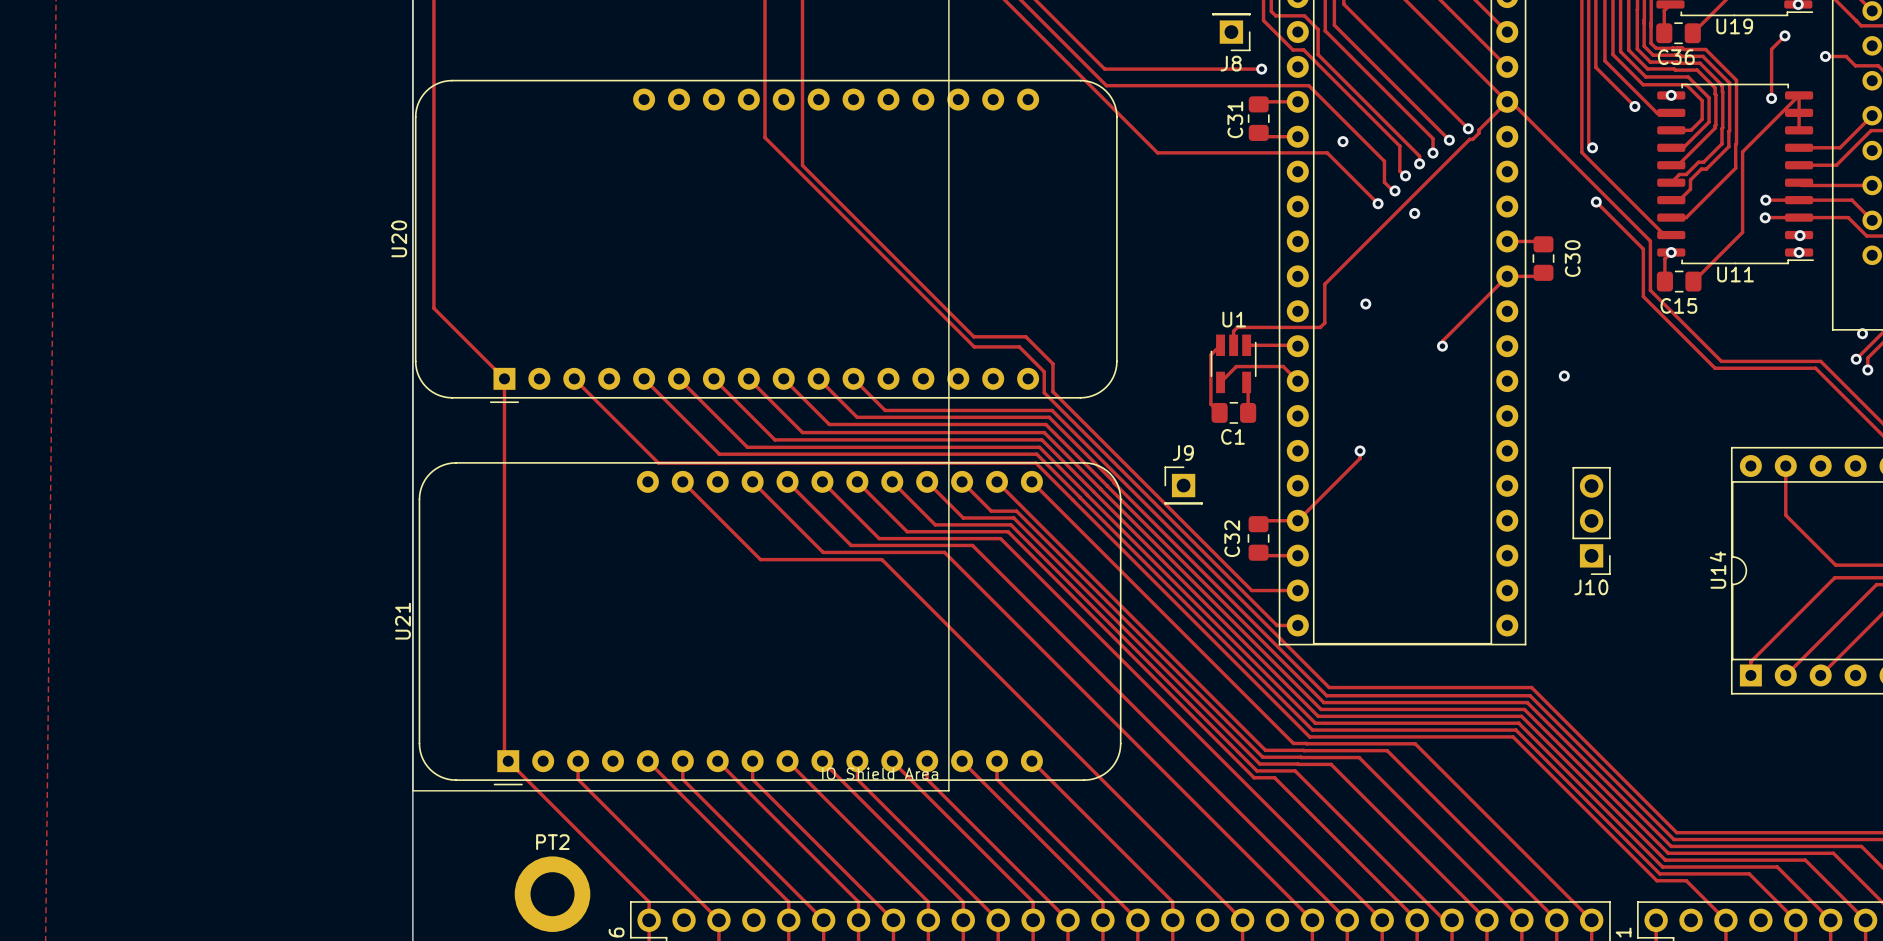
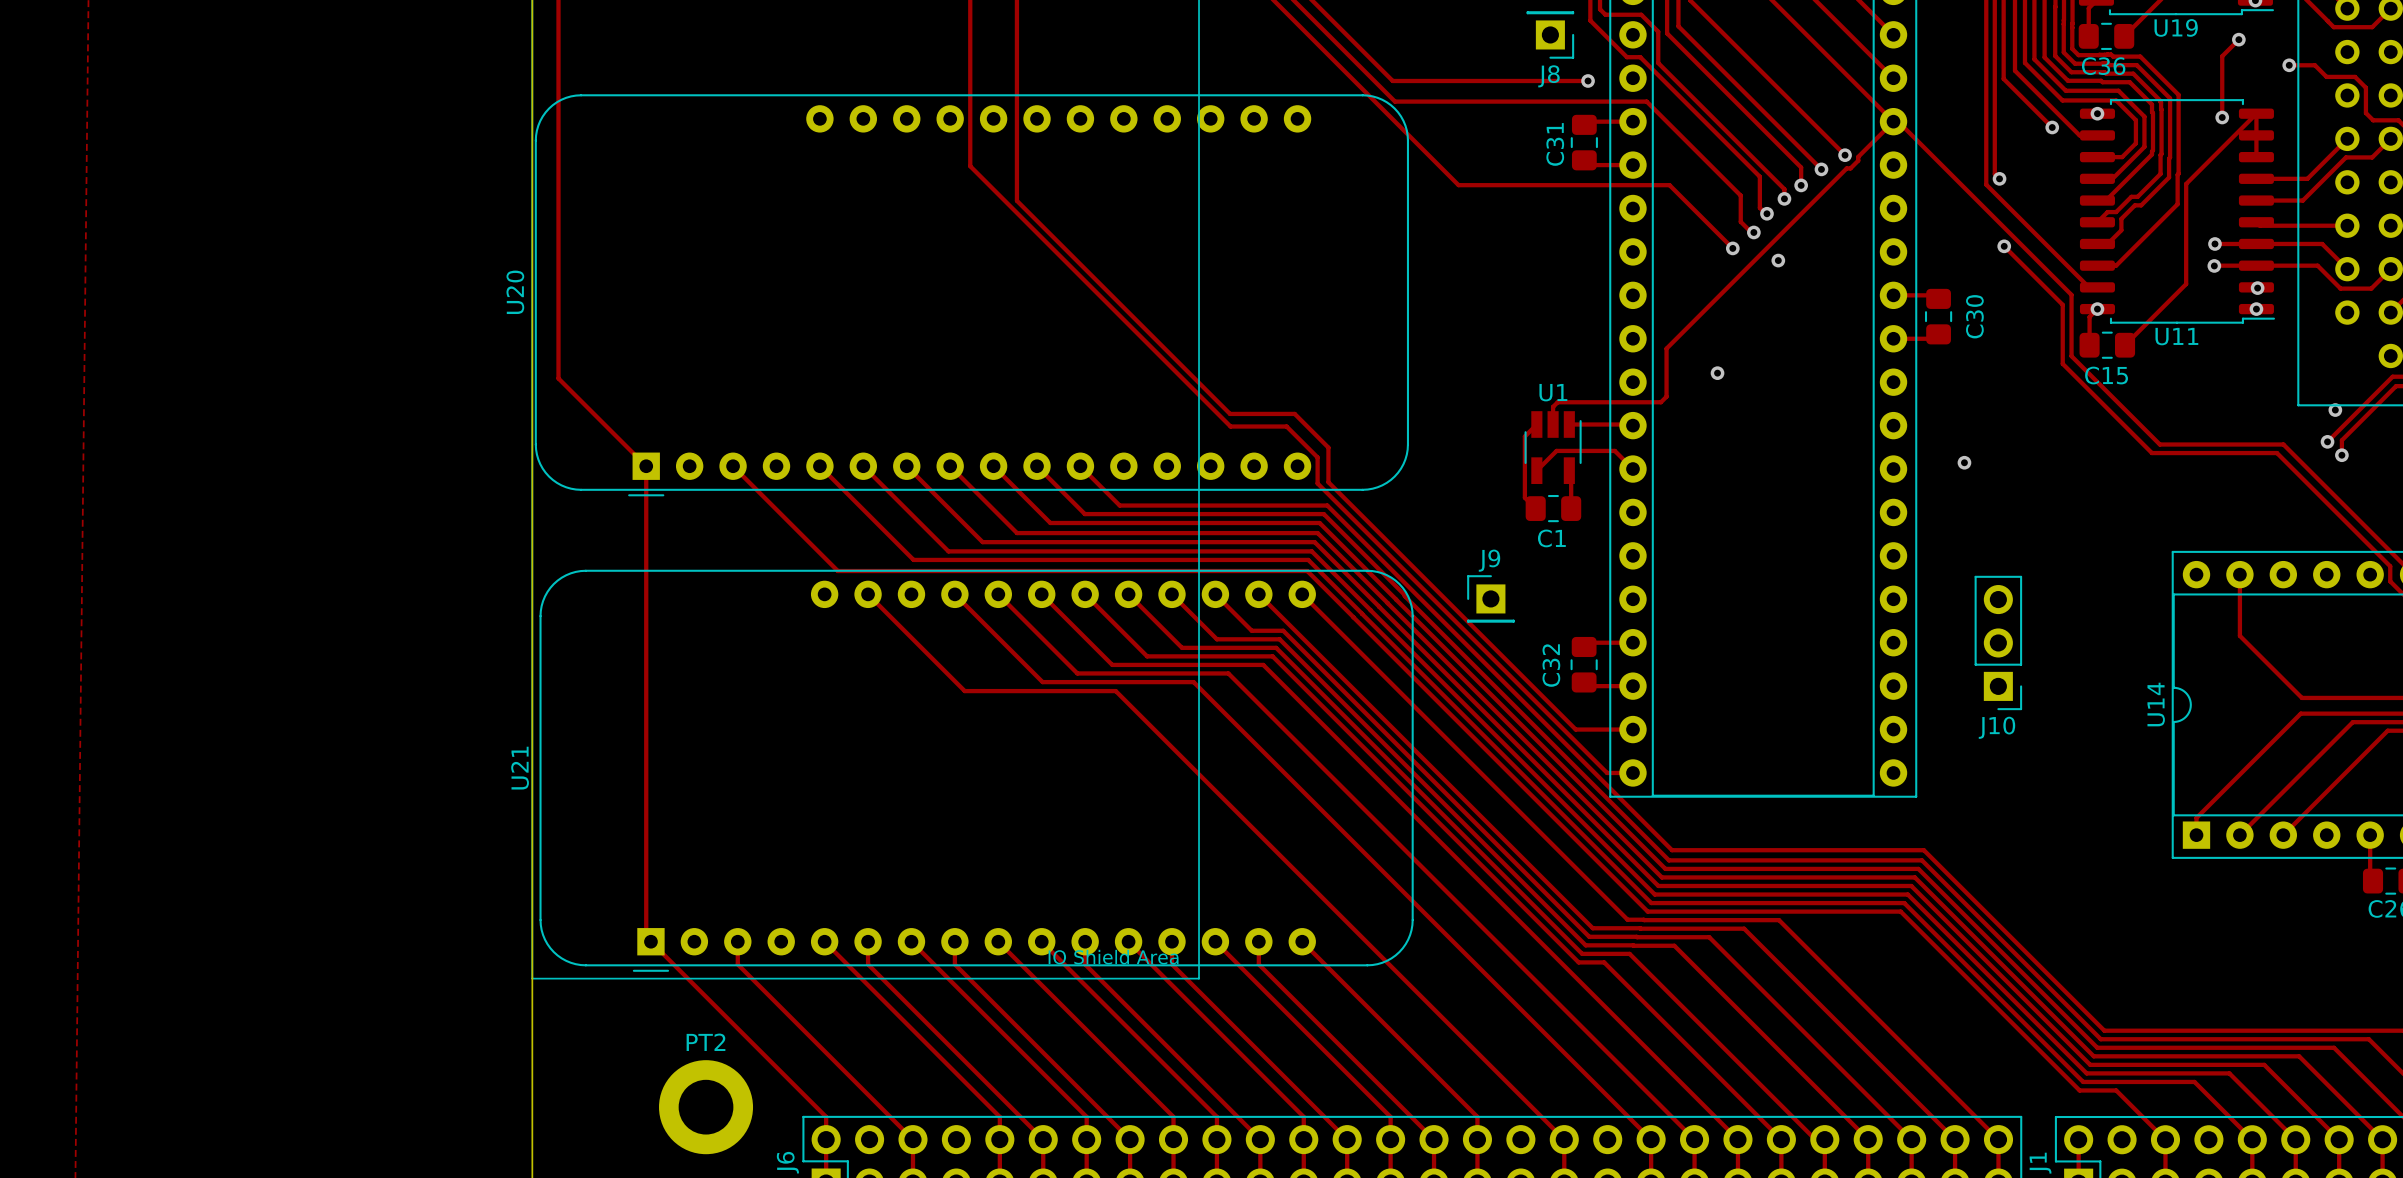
via: (1342, 141) -> none
track: (1507, 276) (1442, 341) (1442, 346) -> none
via: (1442, 346) -> none
track: (1360, 450) (1360, 458) (1297, 520) -> none
via: (1360, 450) -> none

